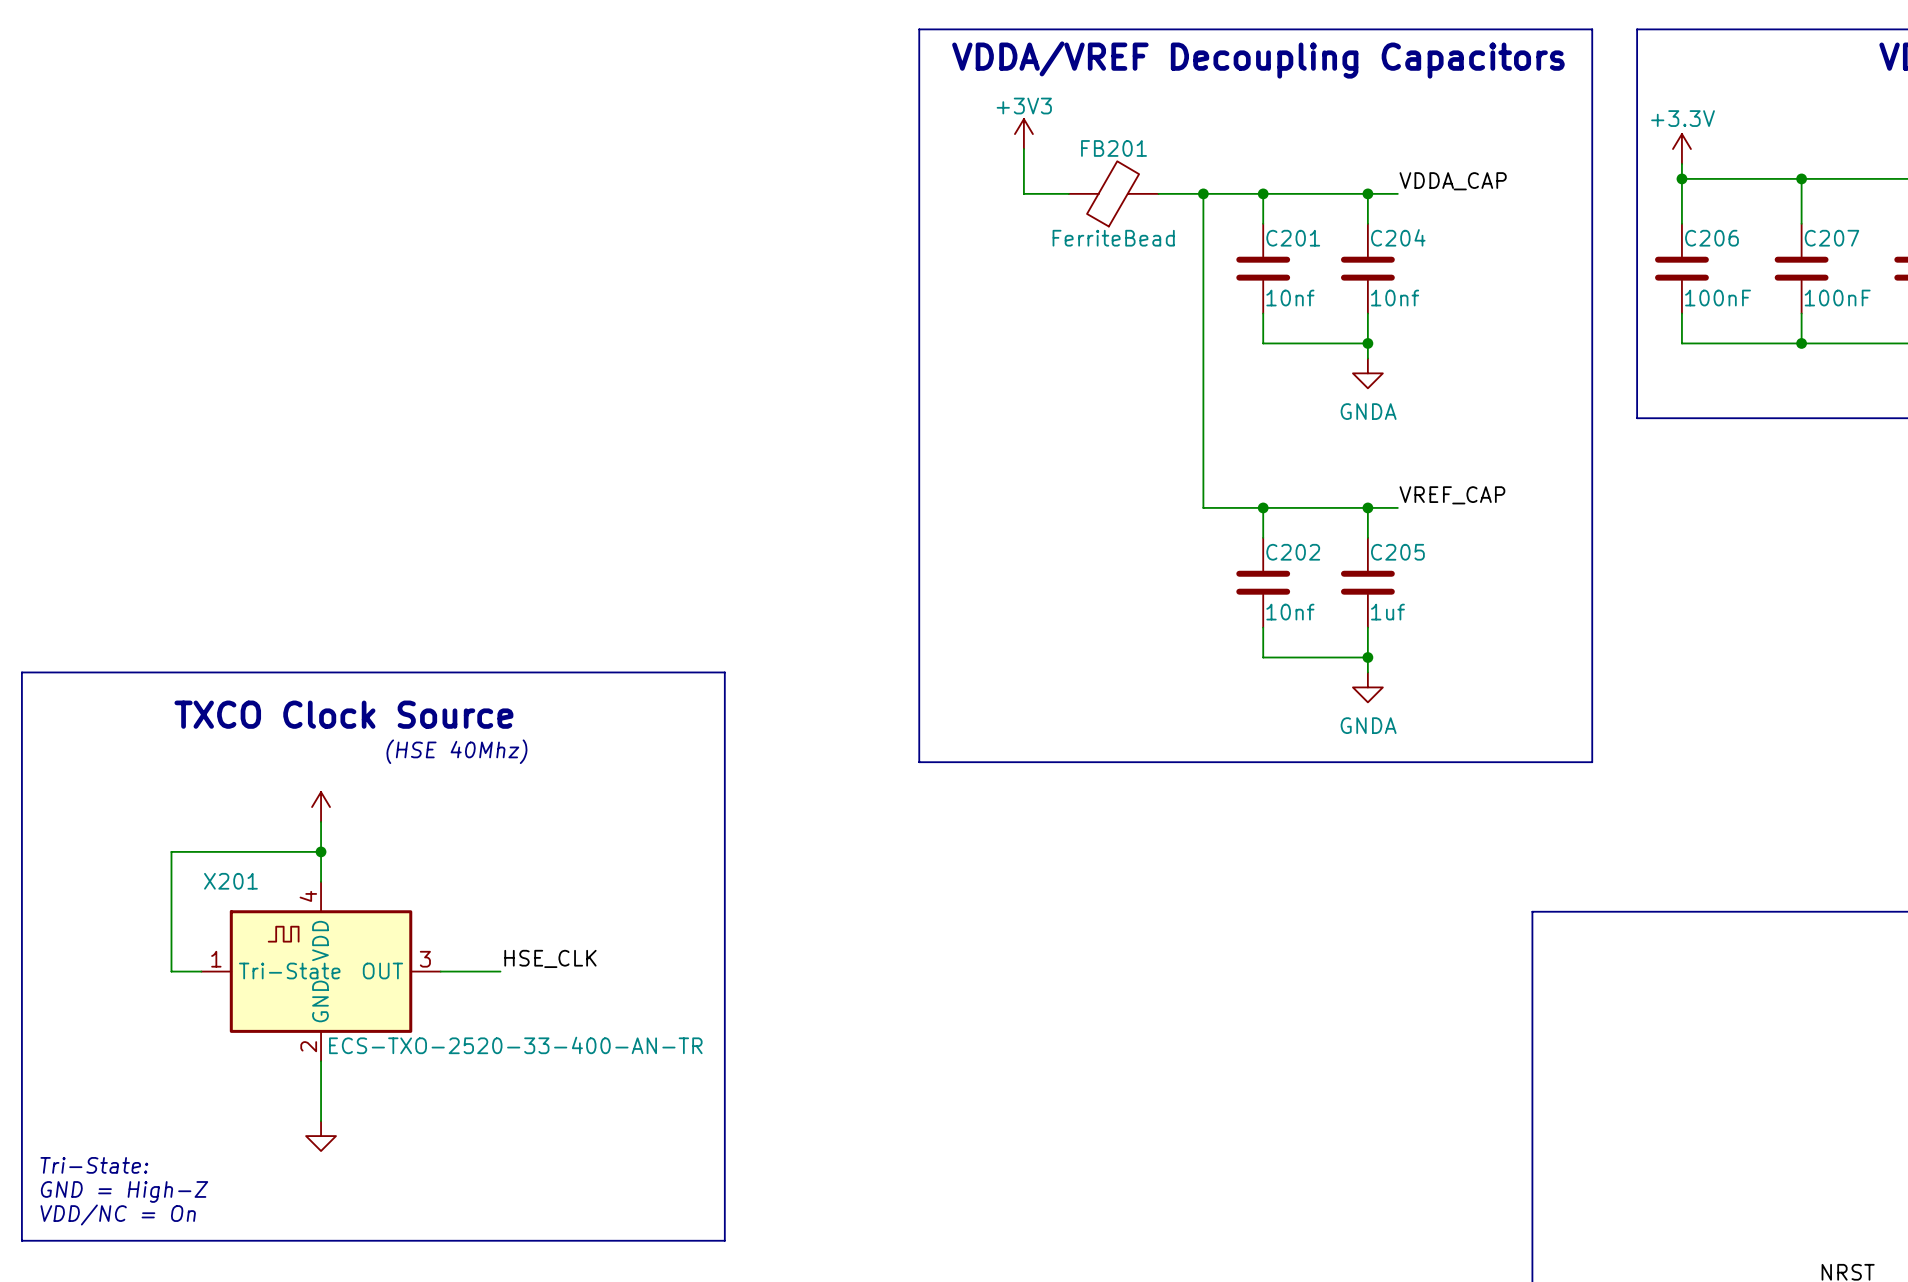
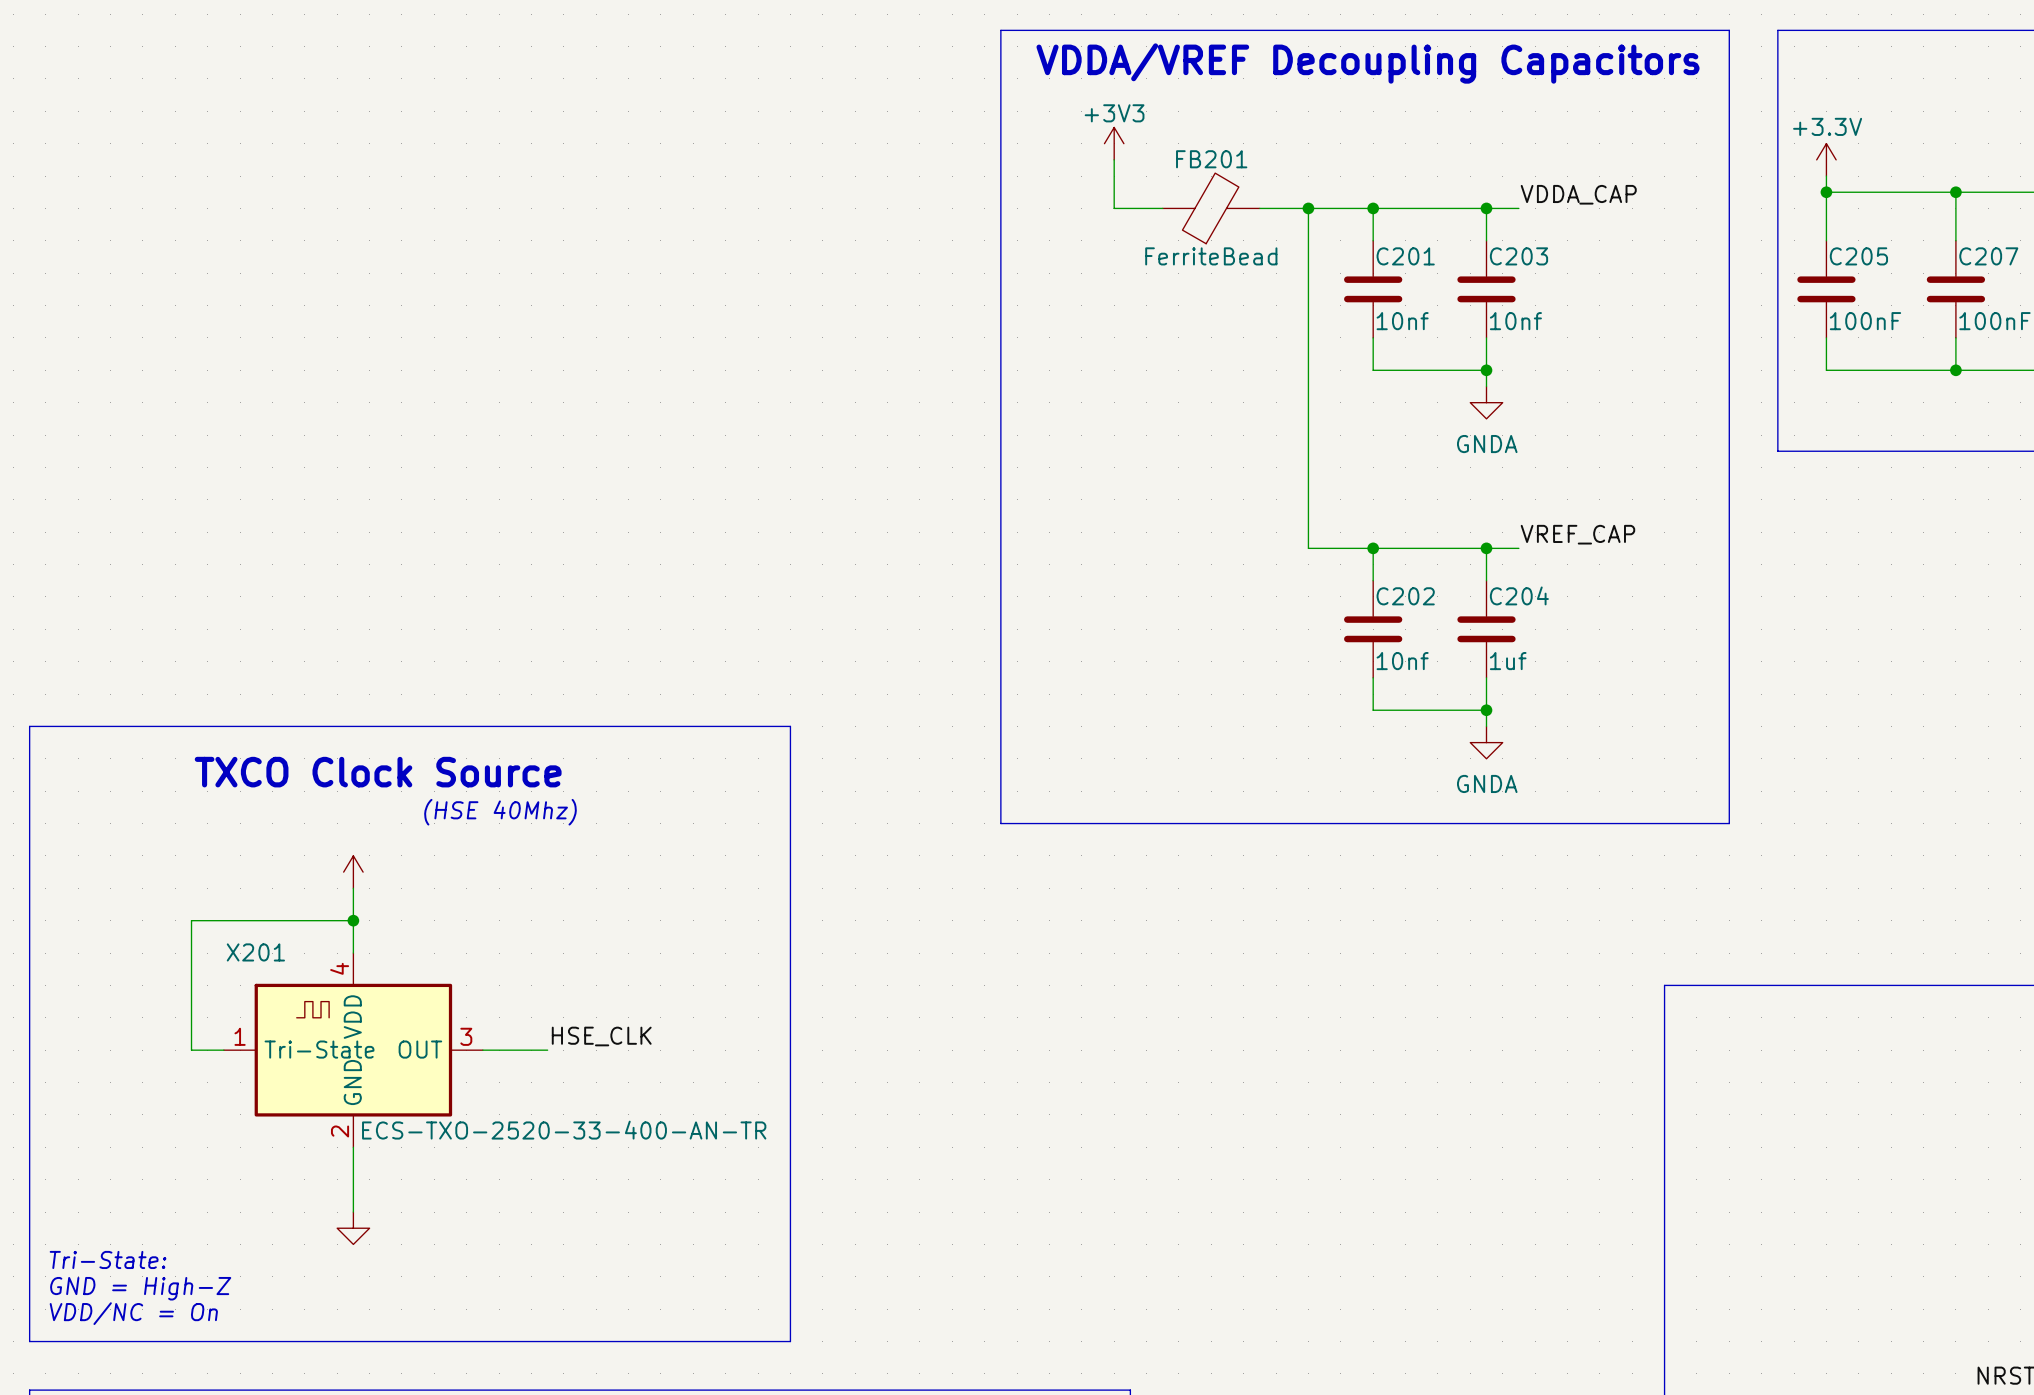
C204 name: C204 (1398, 237) -> C203 (1518, 256)
C206 name: C206 (1711, 238) -> C205 (1858, 256)
C205 name: C205 (1397, 552) -> C204 (1519, 595)

